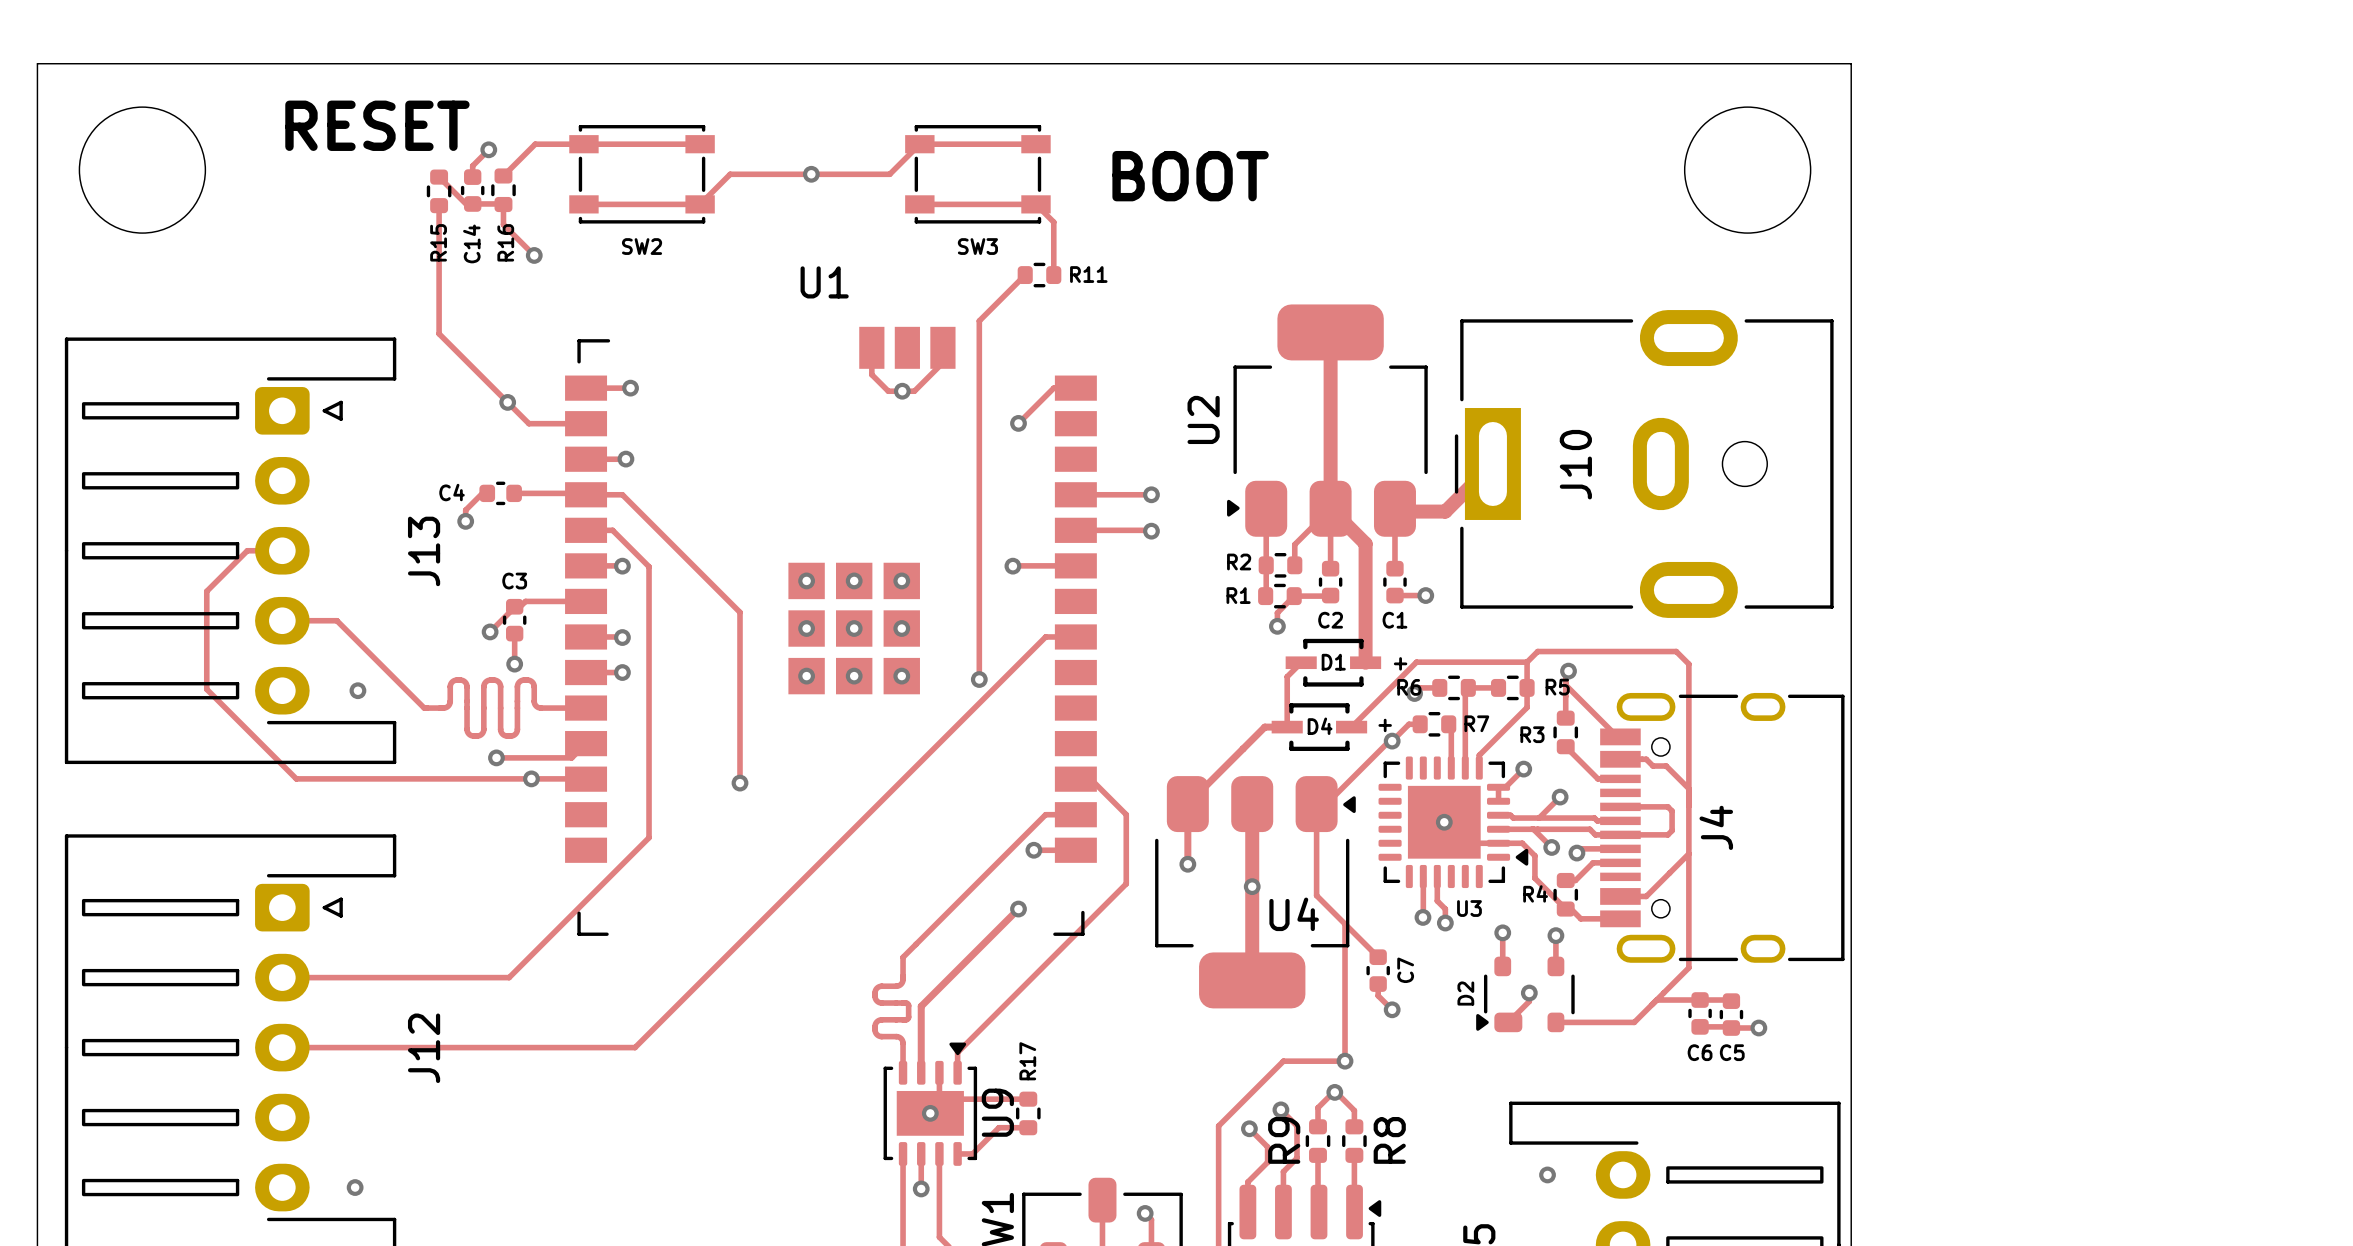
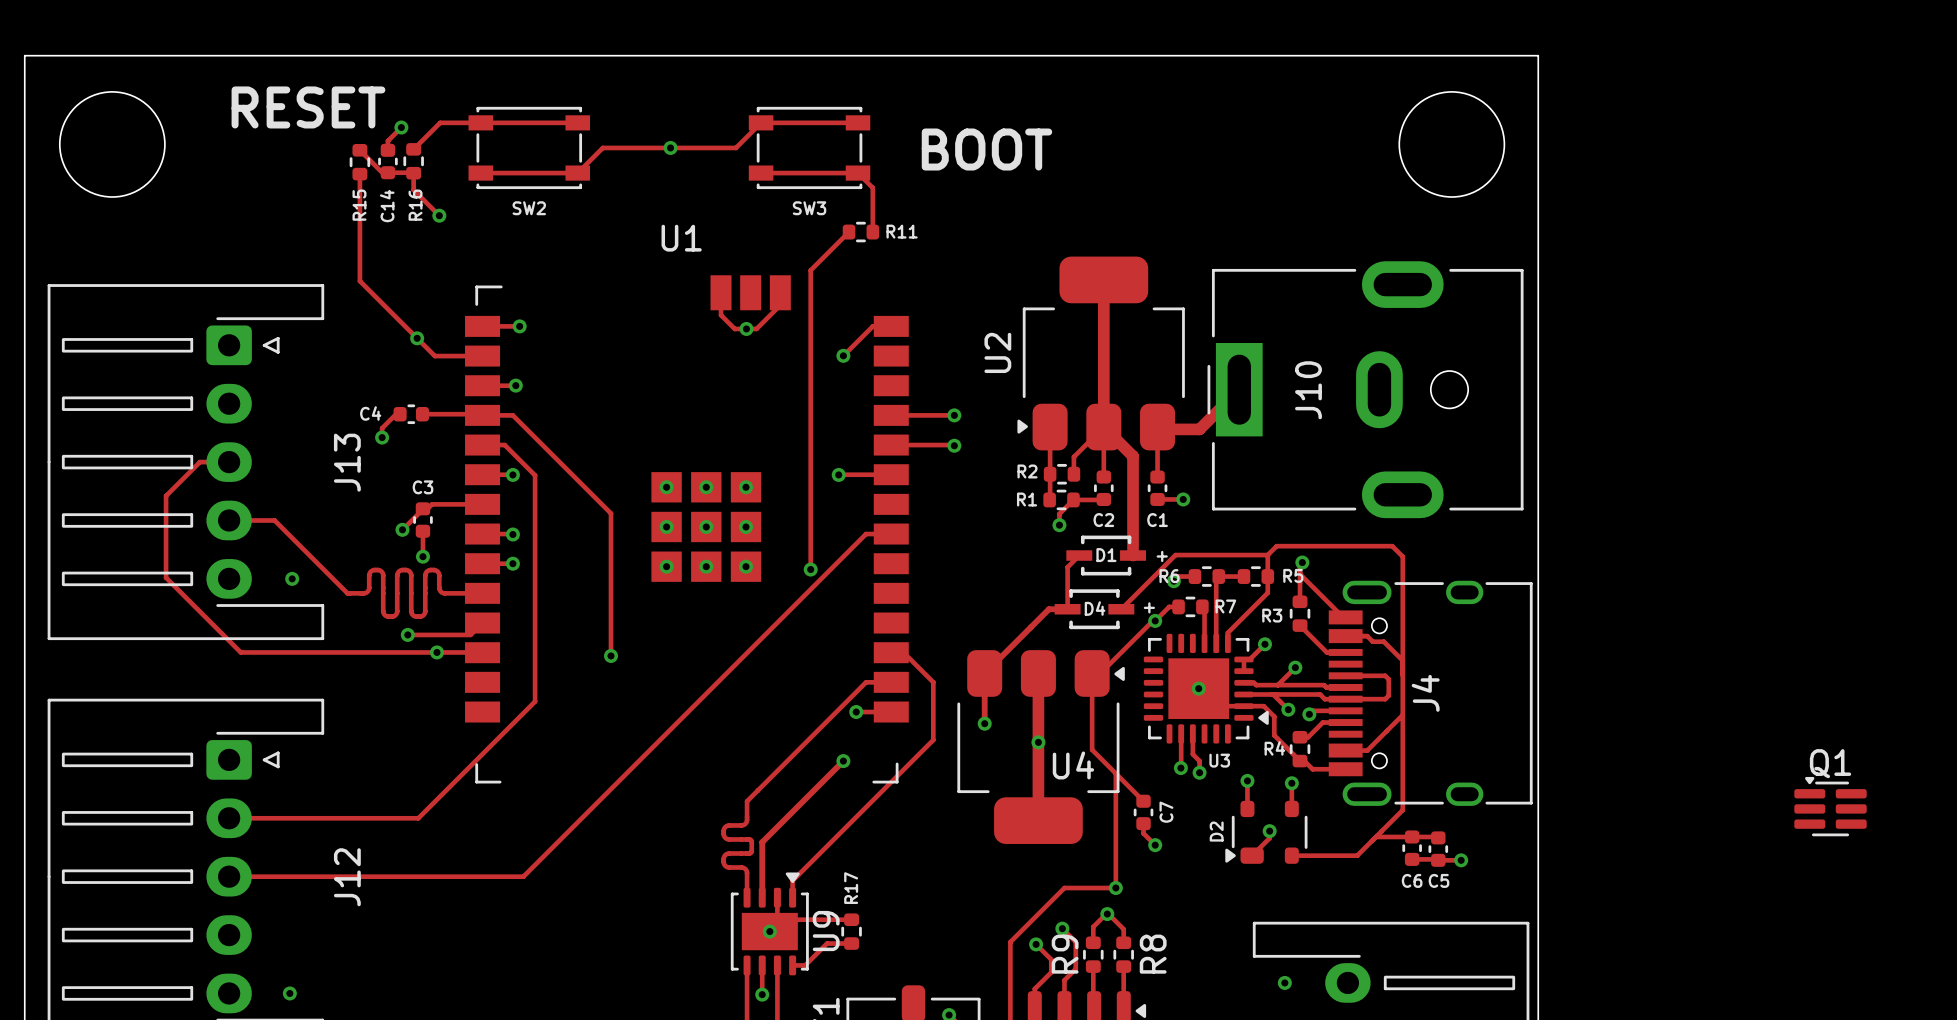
Q1: none -> (1830, 806)

